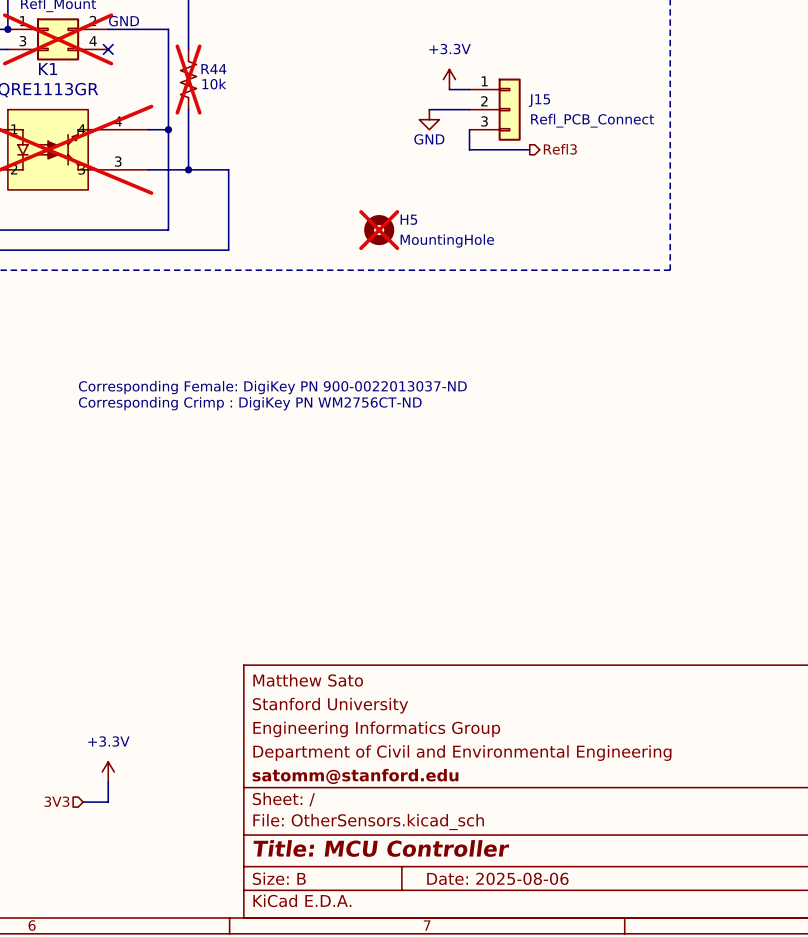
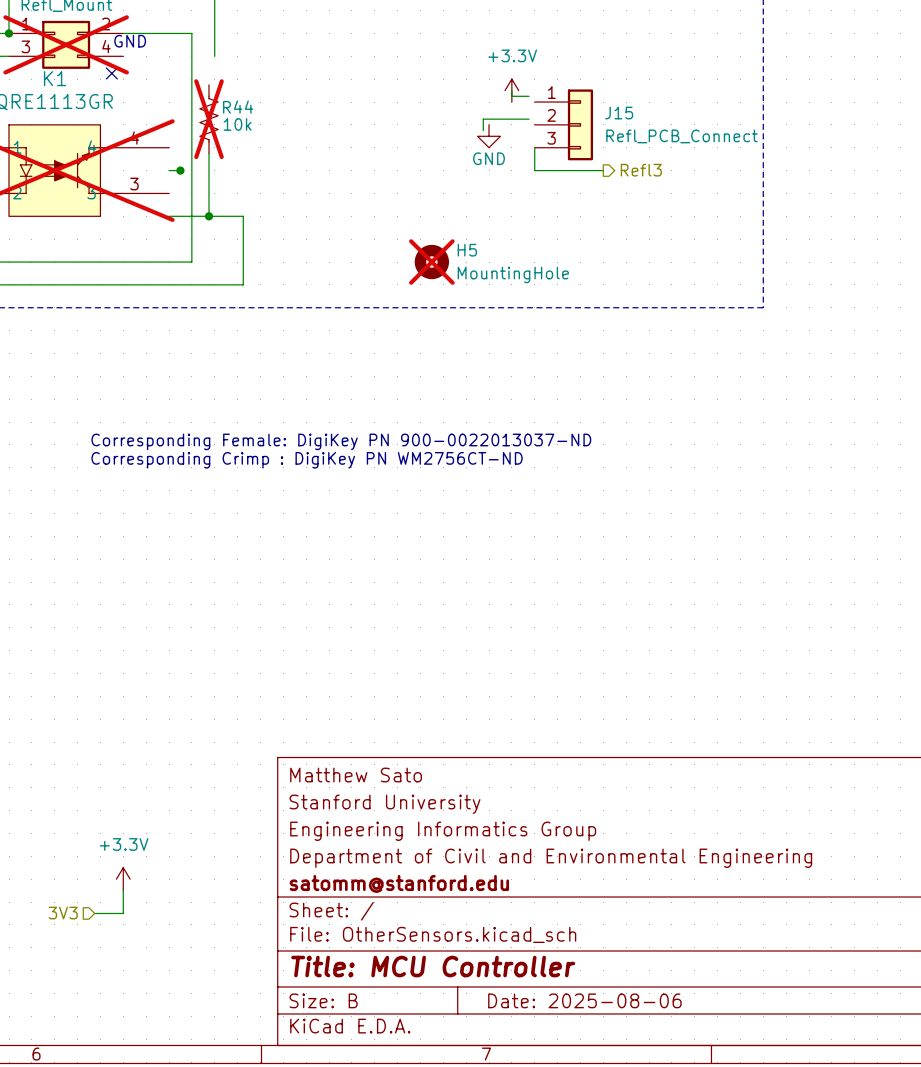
text position: GND (124, 21) -> GND (130, 41)
no-connect mark position: (108, 49) -> (111, 73)
R44 position: (188, 79) -> (209, 119)
wire: none -> (511, 90) (511, 96) (529, 96)
wire: (449, 89) (469, 89) -> none
wire: none -> (529, 119) (483, 119) (483, 130)
wire: (188, 109) (188, 169) -> none
wire: (429, 109) (469, 109) -> none
wire: (148, 129) (168, 129) -> none
junction: (168, 129) -> none
wire: none -> (209, 153) (209, 216)
wire: none -> (169, 170) (180, 170)
junction: none -> (180, 170)
wire: (148, 169) (228, 169) (228, 250) (213, 250) -> (169, 216) (243, 216) (243, 284)
junction: (188, 169) -> none
junction: none -> (209, 216)

